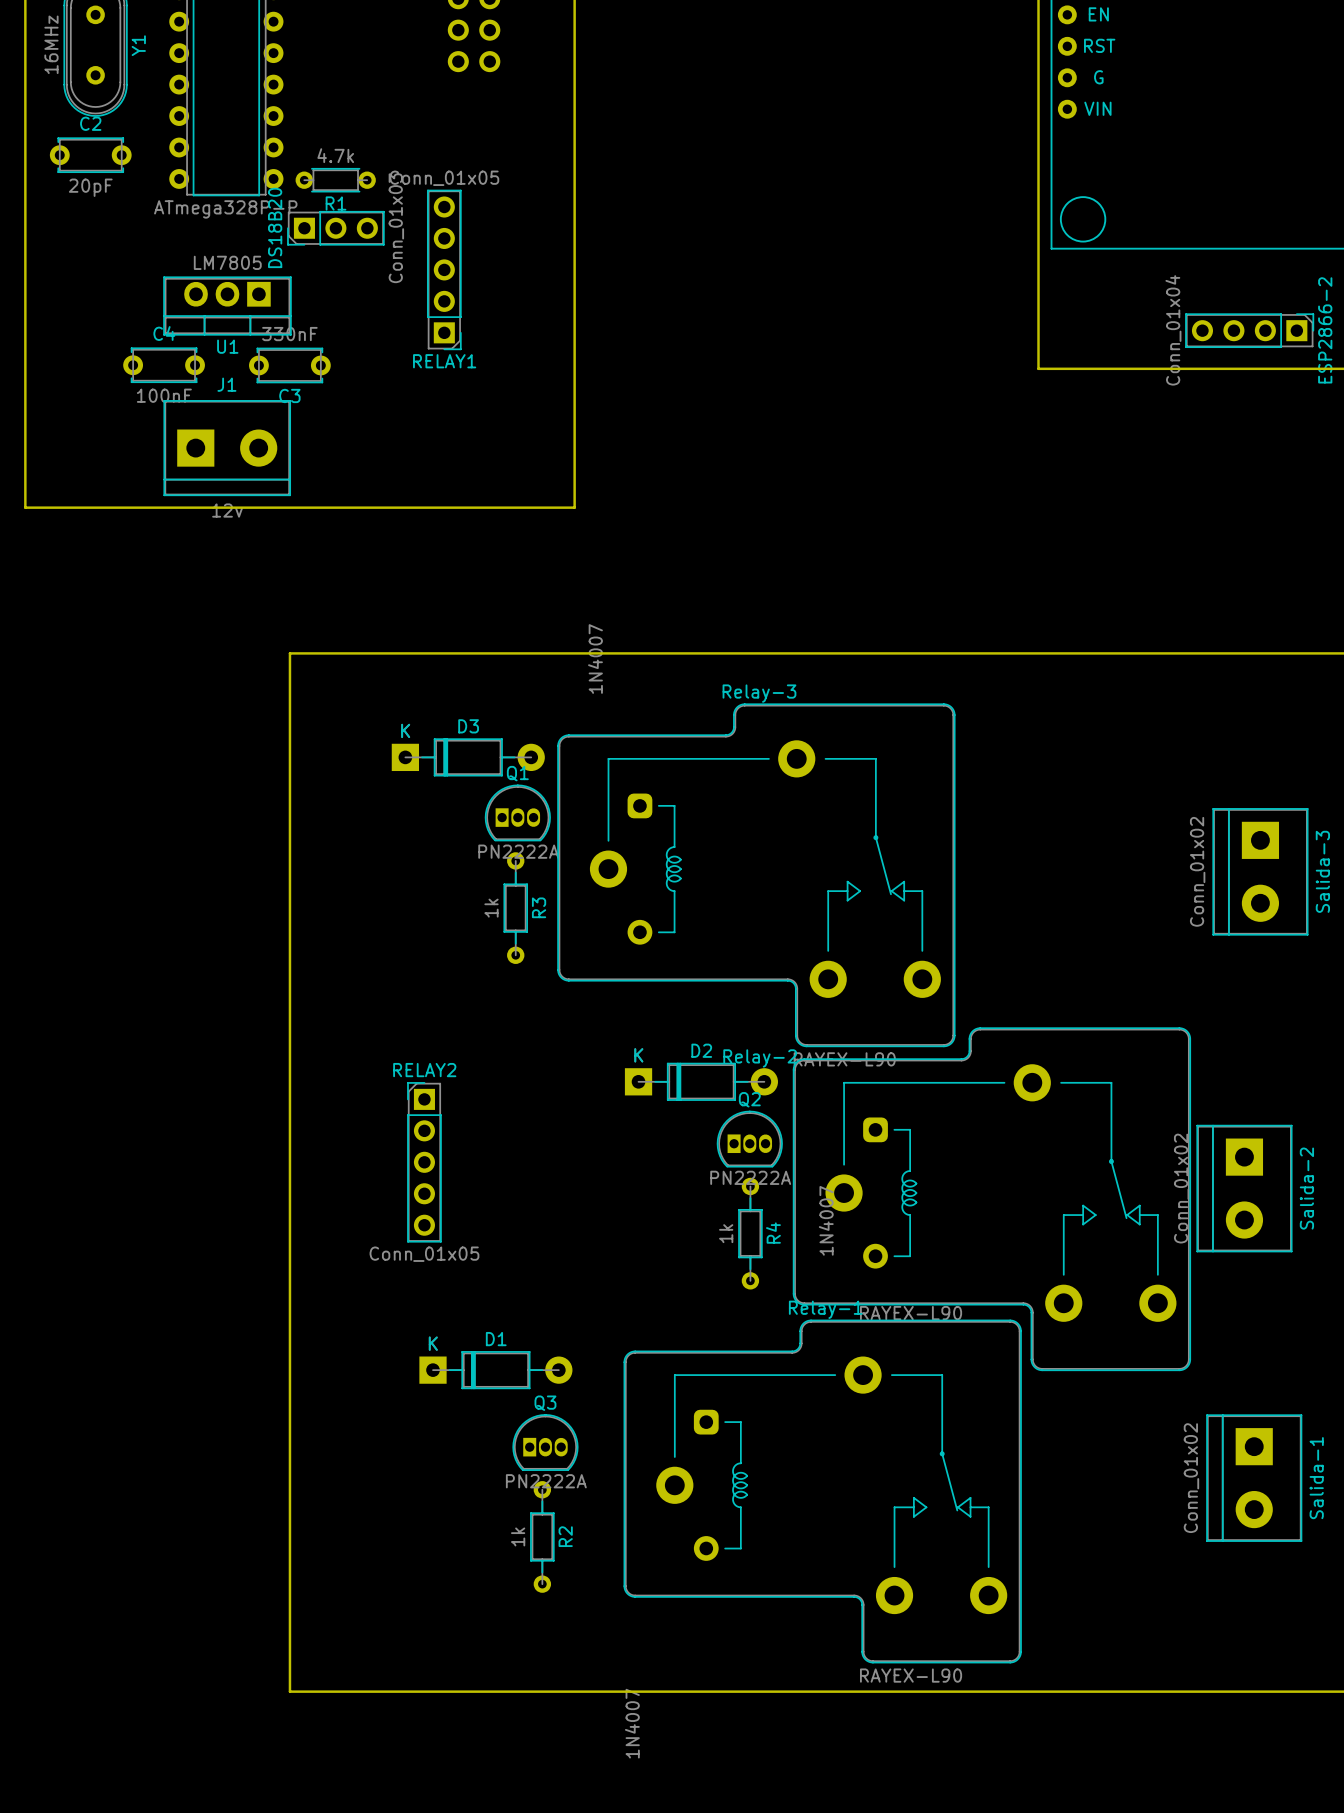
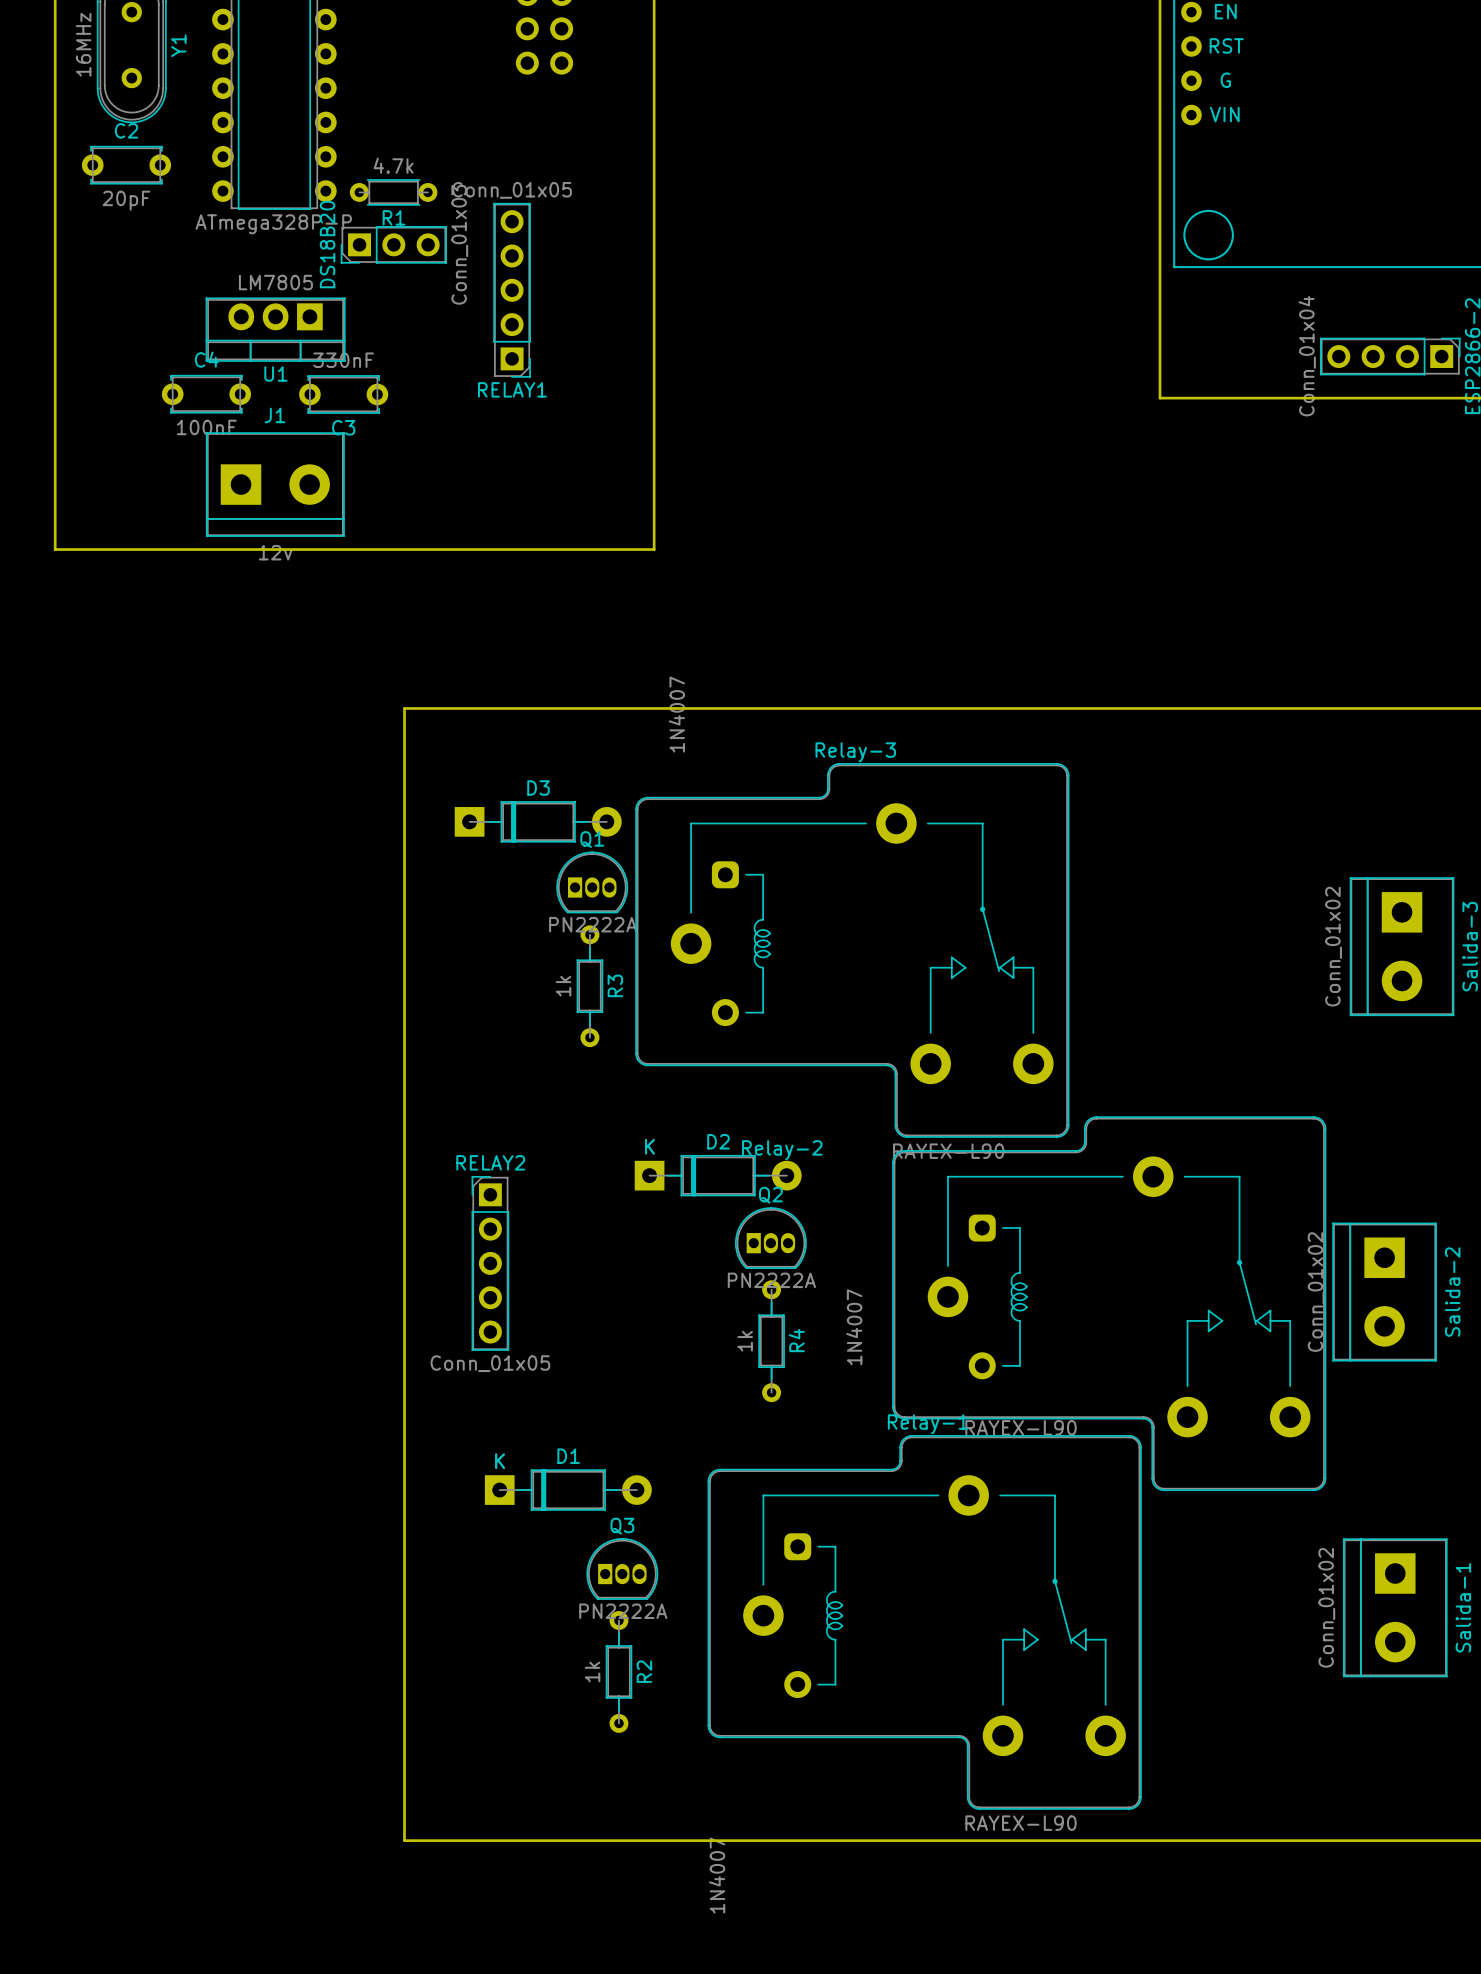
board edge: (345, 653) (289, 653) (289, 1691) (345, 1691) -> (404, 708) (404, 1840)
D3 footprint: [391, 738, 545, 777] -> [454, 801, 622, 843]
Relay-2 name position: Relay-2 (760, 1058) -> Relay-2 (782, 1150)
D2 position: (701, 1081) -> (718, 1175)
Q2 position: (749, 1139) -> (770, 1238)
R4 position: (750, 1233) -> (771, 1341)

